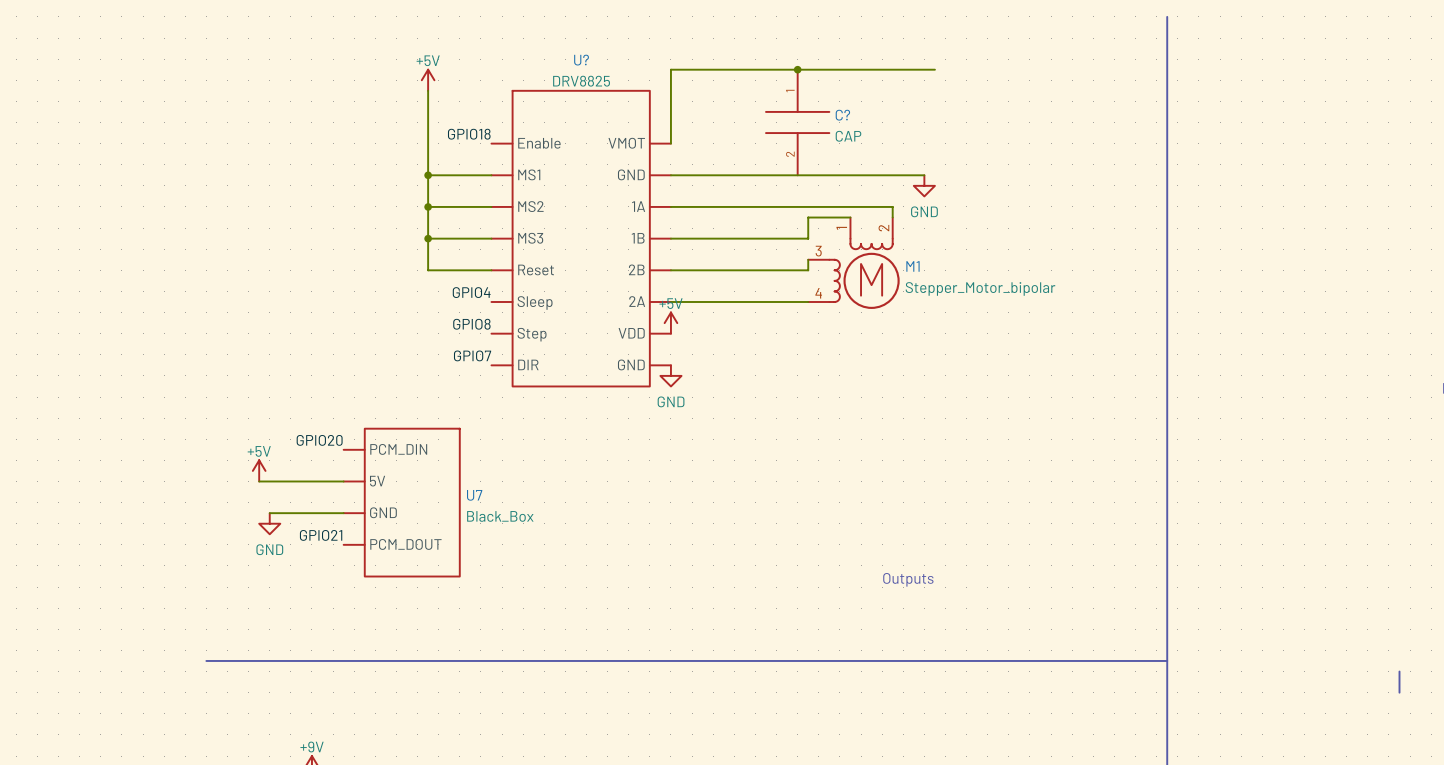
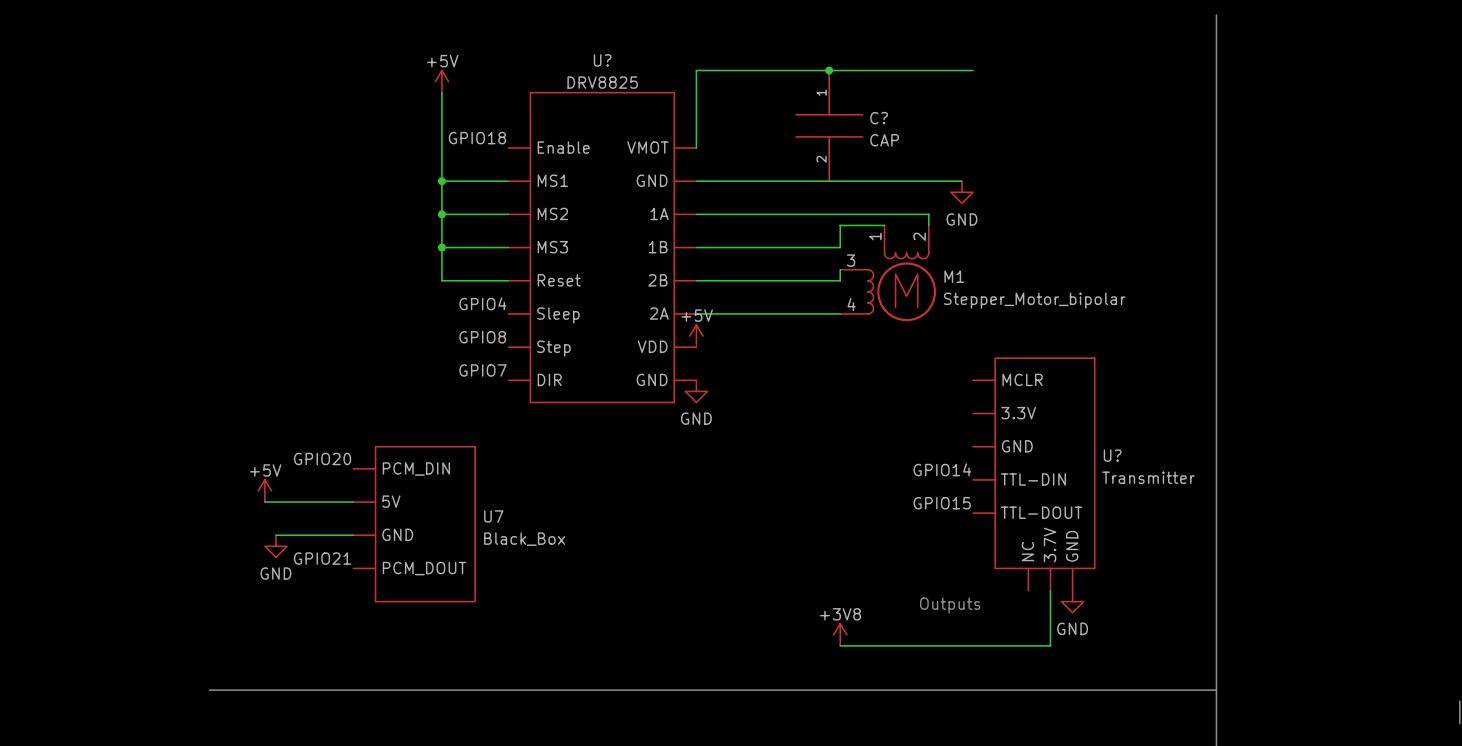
label: none -> GPIO14 (942, 469)
U?: none -> Transmitter (1034, 474)
label: none -> GPIO15 (942, 503)
wire: none -> (1050, 590) (1050, 645) (840, 645)
power symbol: none -> GND (1072, 601)
power symbol: none -> +3V8 (840, 634)

